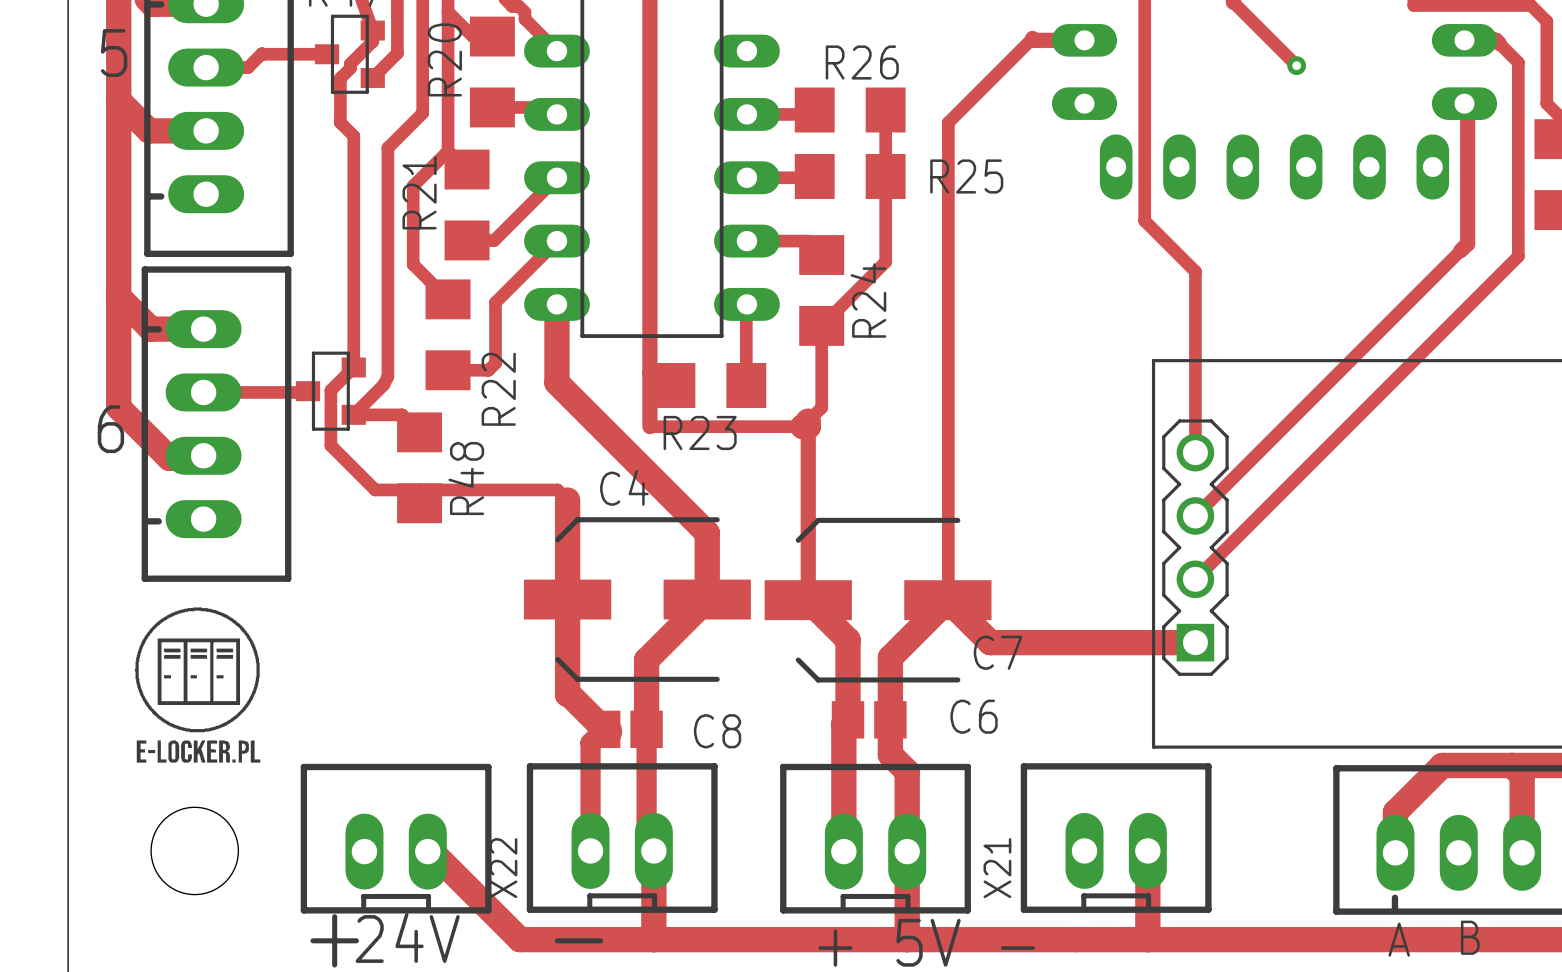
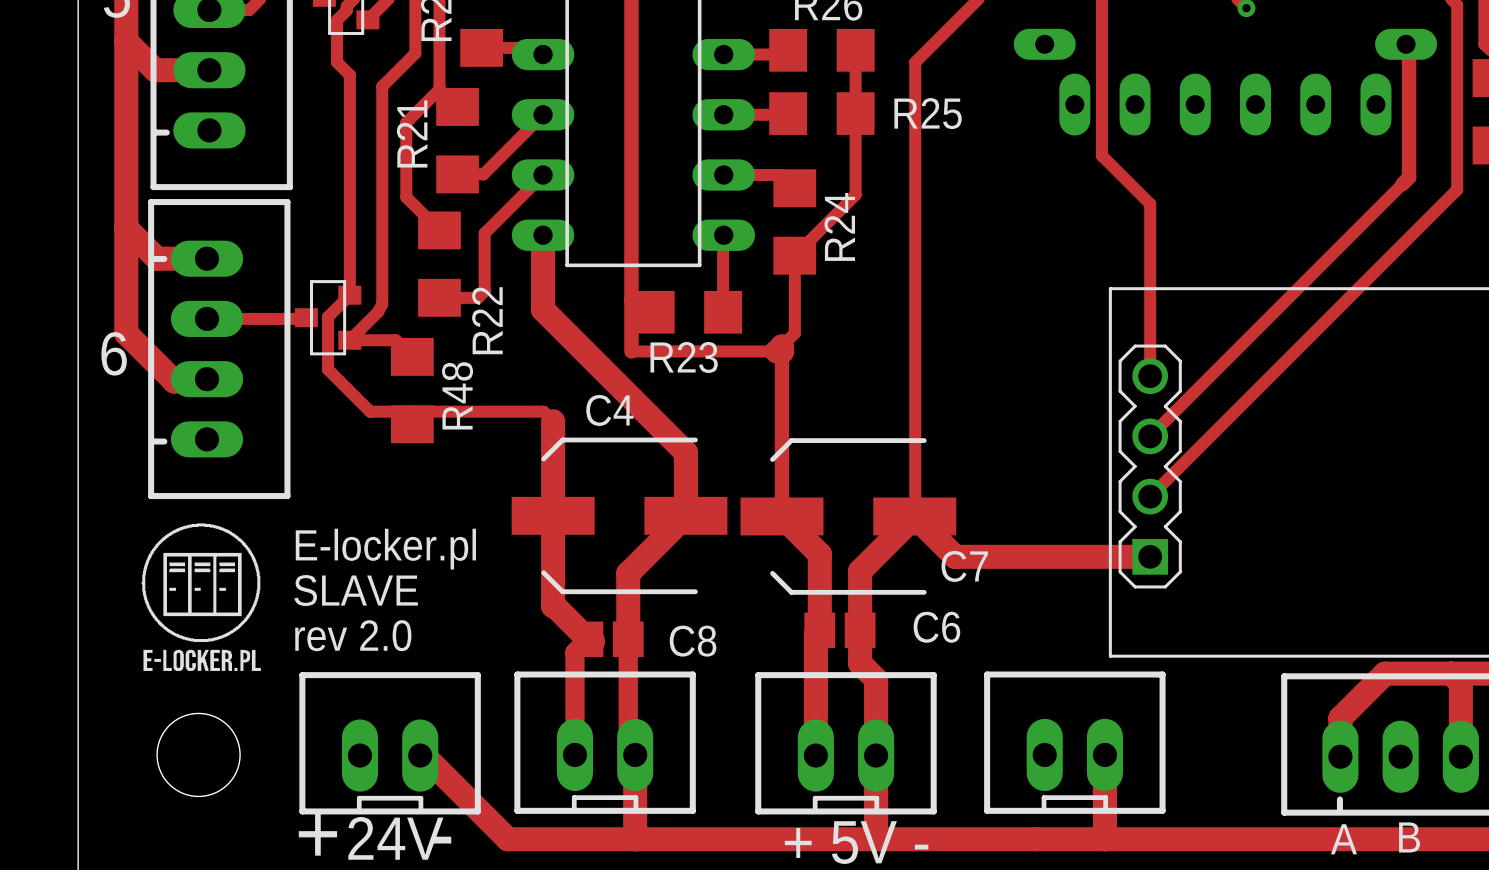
text: none -> E-locker.pl (385, 549)
text: none -> SLAVE (356, 590)
text: none -> rev 2.0 (353, 635)
X22 name: X22 (503, 868) -> none
X21 name: X21 (997, 868) -> none

